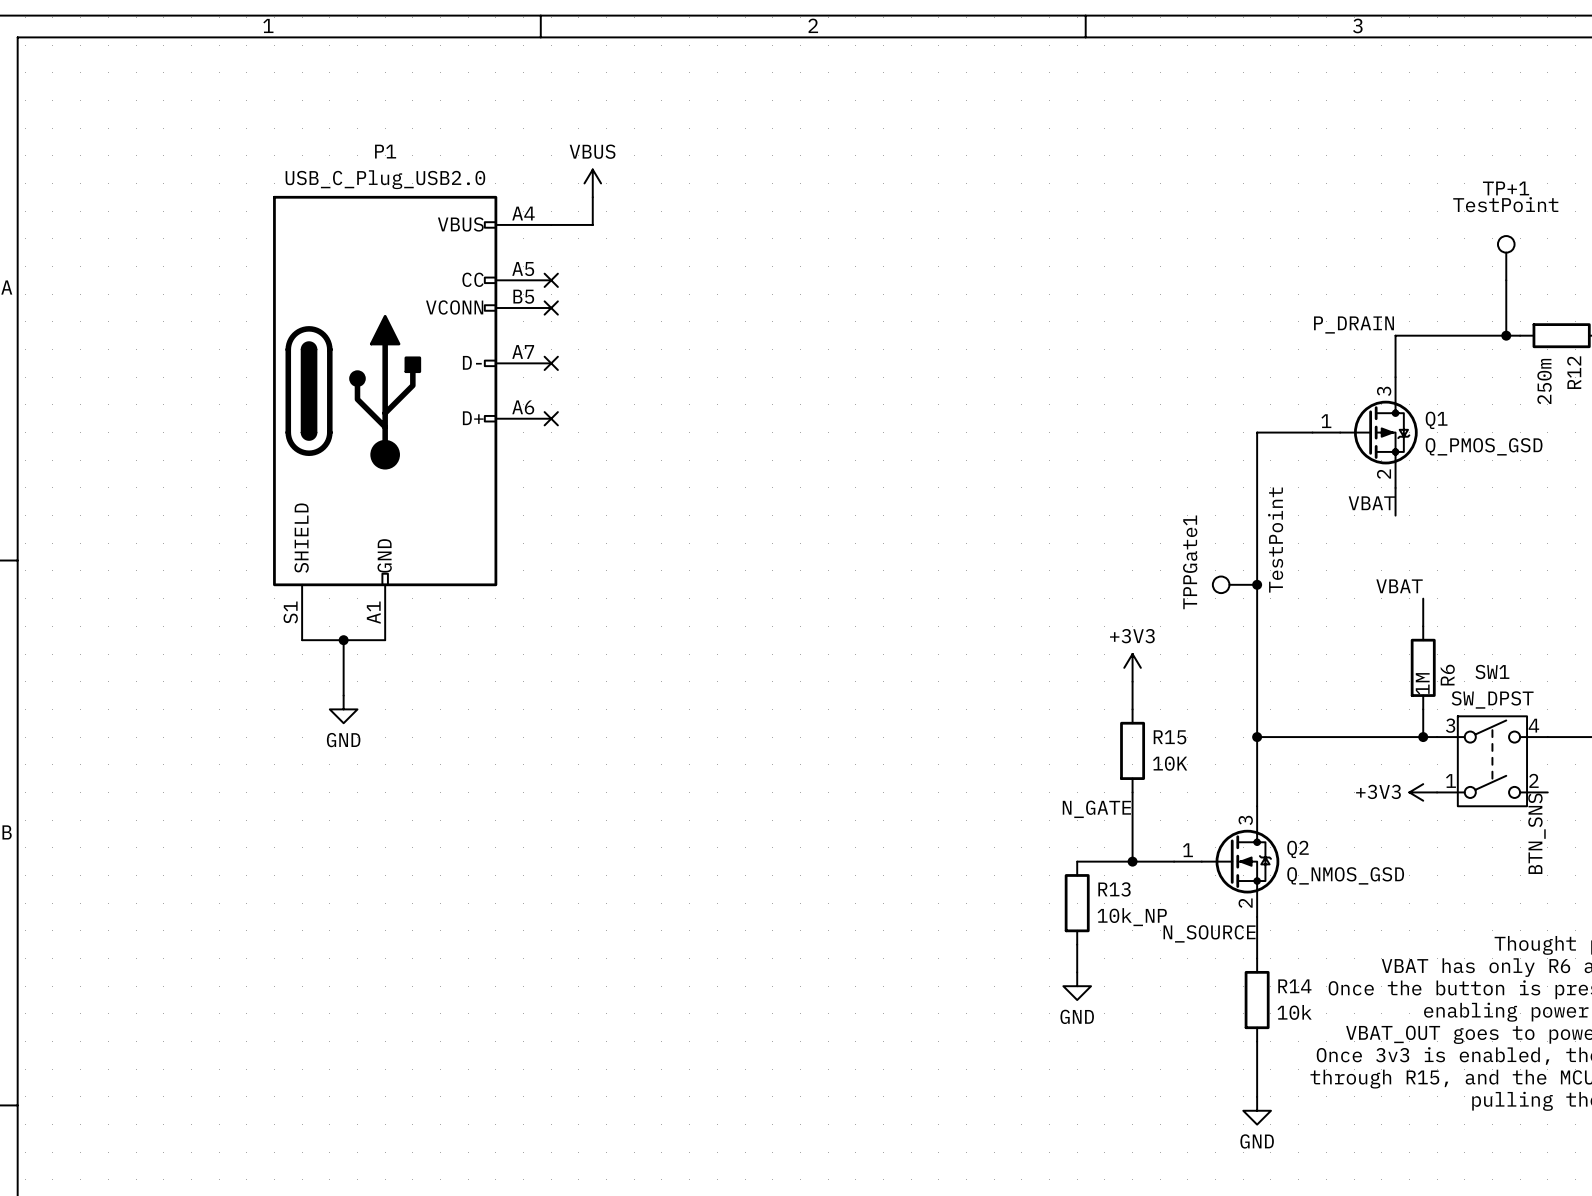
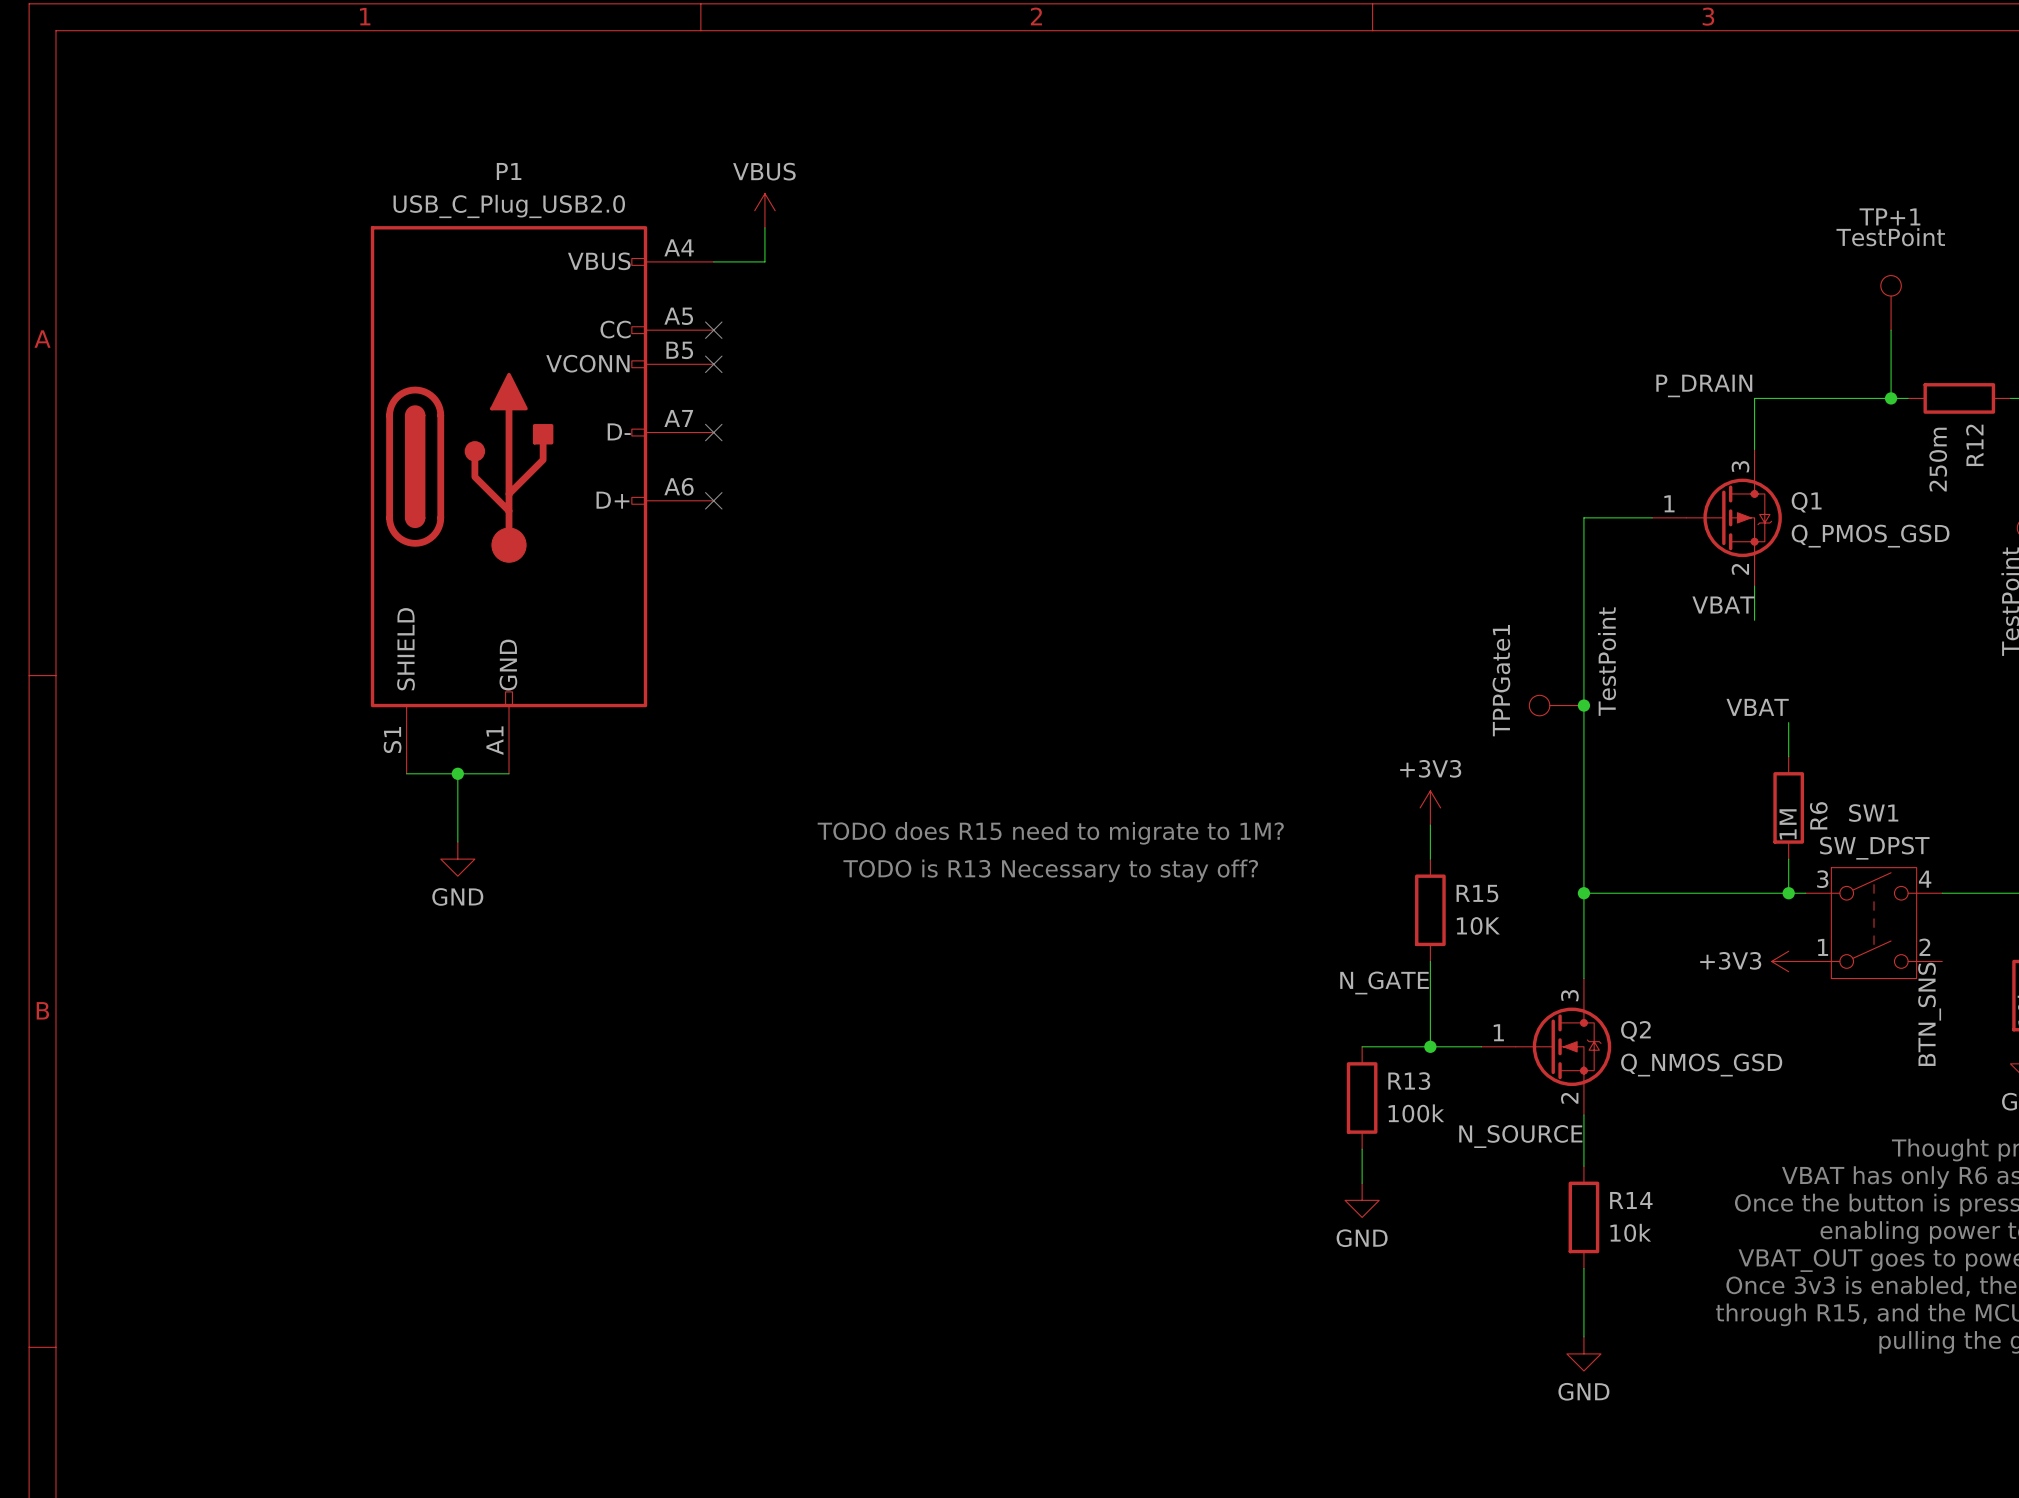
text: none -> TODO does R15 need to migrate to 1M? (1050, 833)
text: none -> TODO is R13 Necessary to stay off? (1050, 870)
R13 value: 10k_NP (1132, 917) -> 100k (1416, 1113)

